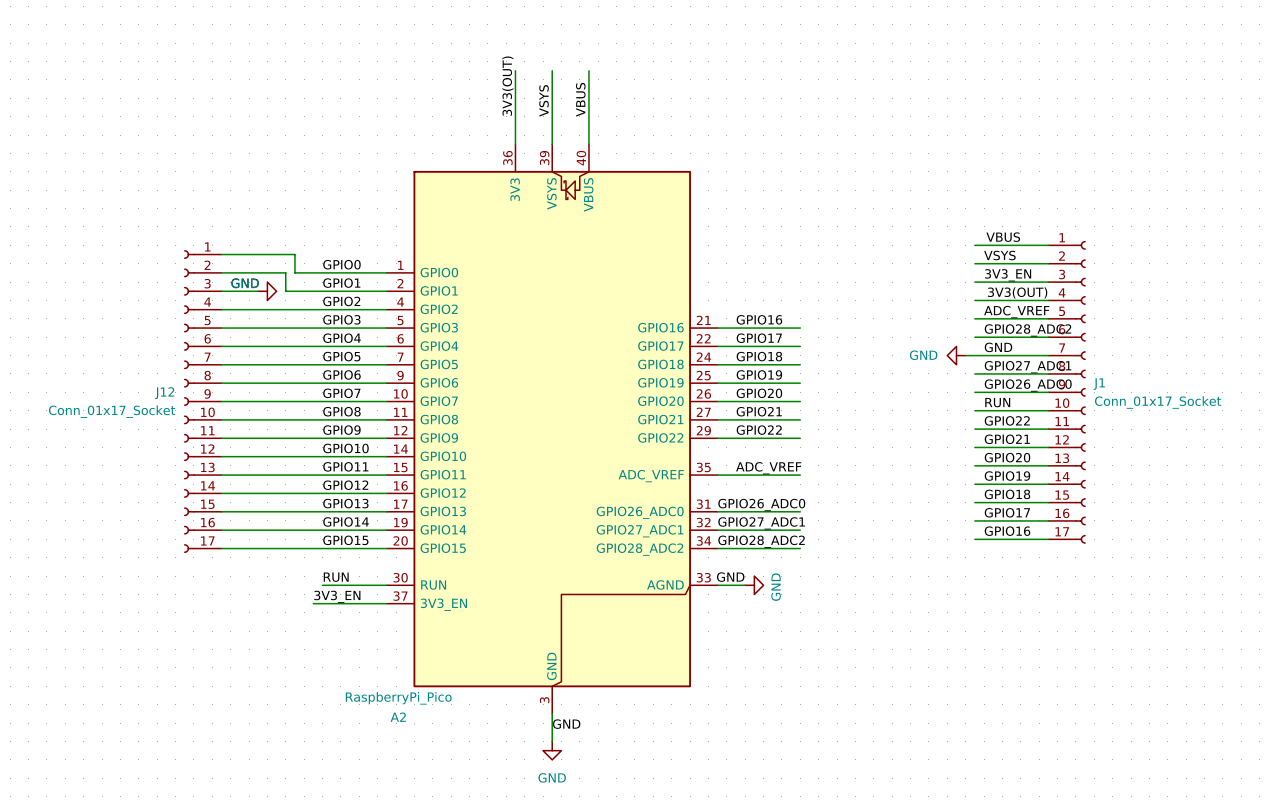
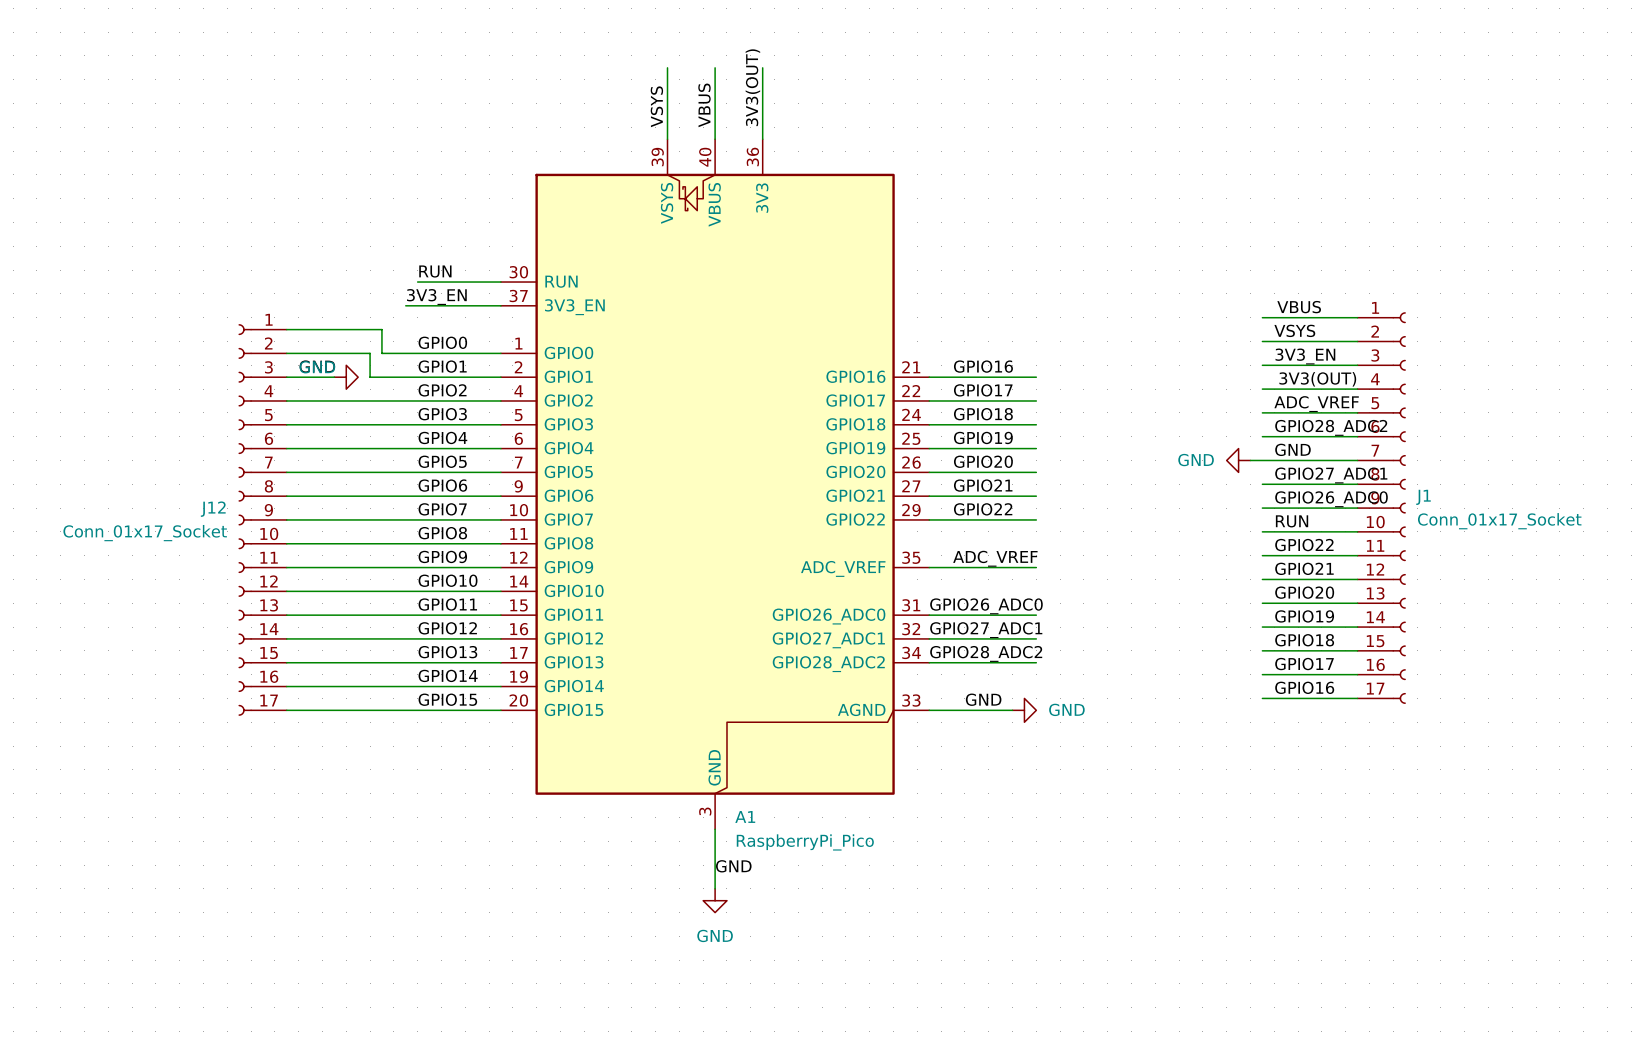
wire: none -> (667, 67) (667, 91)
wire: none -> (715, 67) (715, 91)
wire: none -> (762, 67) (762, 91)
label position: 3V3(OUT) (507, 86) -> 3V3(OUT) (752, 87)
label position: VBUS (580, 99) -> VBUS (704, 105)
label position: VSYS (544, 100) -> VSYS (656, 106)
label: none -> RUN (435, 271)
wire: none -> (417, 282) (500, 282)
label: none -> 3V3_EN (436, 297)
wire: none -> (405, 305) (500, 305)
label: none -> GPIO16 (983, 366)
wire: none -> (929, 377) (1036, 377)
label: none -> GPIO17 (983, 390)
label: GPIO16 (759, 319) -> GPIO18 (983, 414)
label: GPIO17 (759, 338) -> GPIO19 (983, 437)
label: GPIO18 (759, 356) -> GPIO20 (983, 461)
A1: none -> RaspberryPi_Pico (715, 484)
label: GPIO19 (759, 374) -> GPIO21 (983, 485)
label: GPIO20 (759, 393) -> GPIO22 (983, 509)
label: GPIO21 (759, 411) -> none
wire: (717, 419) (800, 419) -> (929, 400) (1036, 400)
A2: RaspberryPi_Pico (552, 429) -> none
label: GPIO22 (759, 430) -> ADC_VREF (995, 558)
label: none -> GPIO26_ADC0 (986, 606)
label: ADC_VREF (768, 468) -> none
label: GPIO26_ADC0 (761, 504) -> GPIO28_ADC2 (986, 653)
label position: GPIO27_ADC1 (761, 523) -> GPIO27_ADC1 (986, 630)
wire: (717, 530) (800, 530) -> (929, 638) (1036, 638)
label: GPIO28_ADC2 (761, 541) -> none
label: RUN (336, 577) -> none
label position: GND (730, 577) -> GND (983, 699)
wire: (322, 585) (386, 585) -> none
wire: (717, 585) (745, 585) -> none
power symbol position: GND (754, 585) -> GND (1024, 710)
power symbol text rotation: 0° (776, 587) -> 90° clockwise (1066, 709)
label: 3V3_EN (337, 596) -> none
wire: (313, 603) (386, 603) -> none
wire: (552, 713) (552, 741) -> none
label position: GND (566, 724) -> GND (733, 866)
power symbol position: GND (552, 750) -> GND (715, 900)

